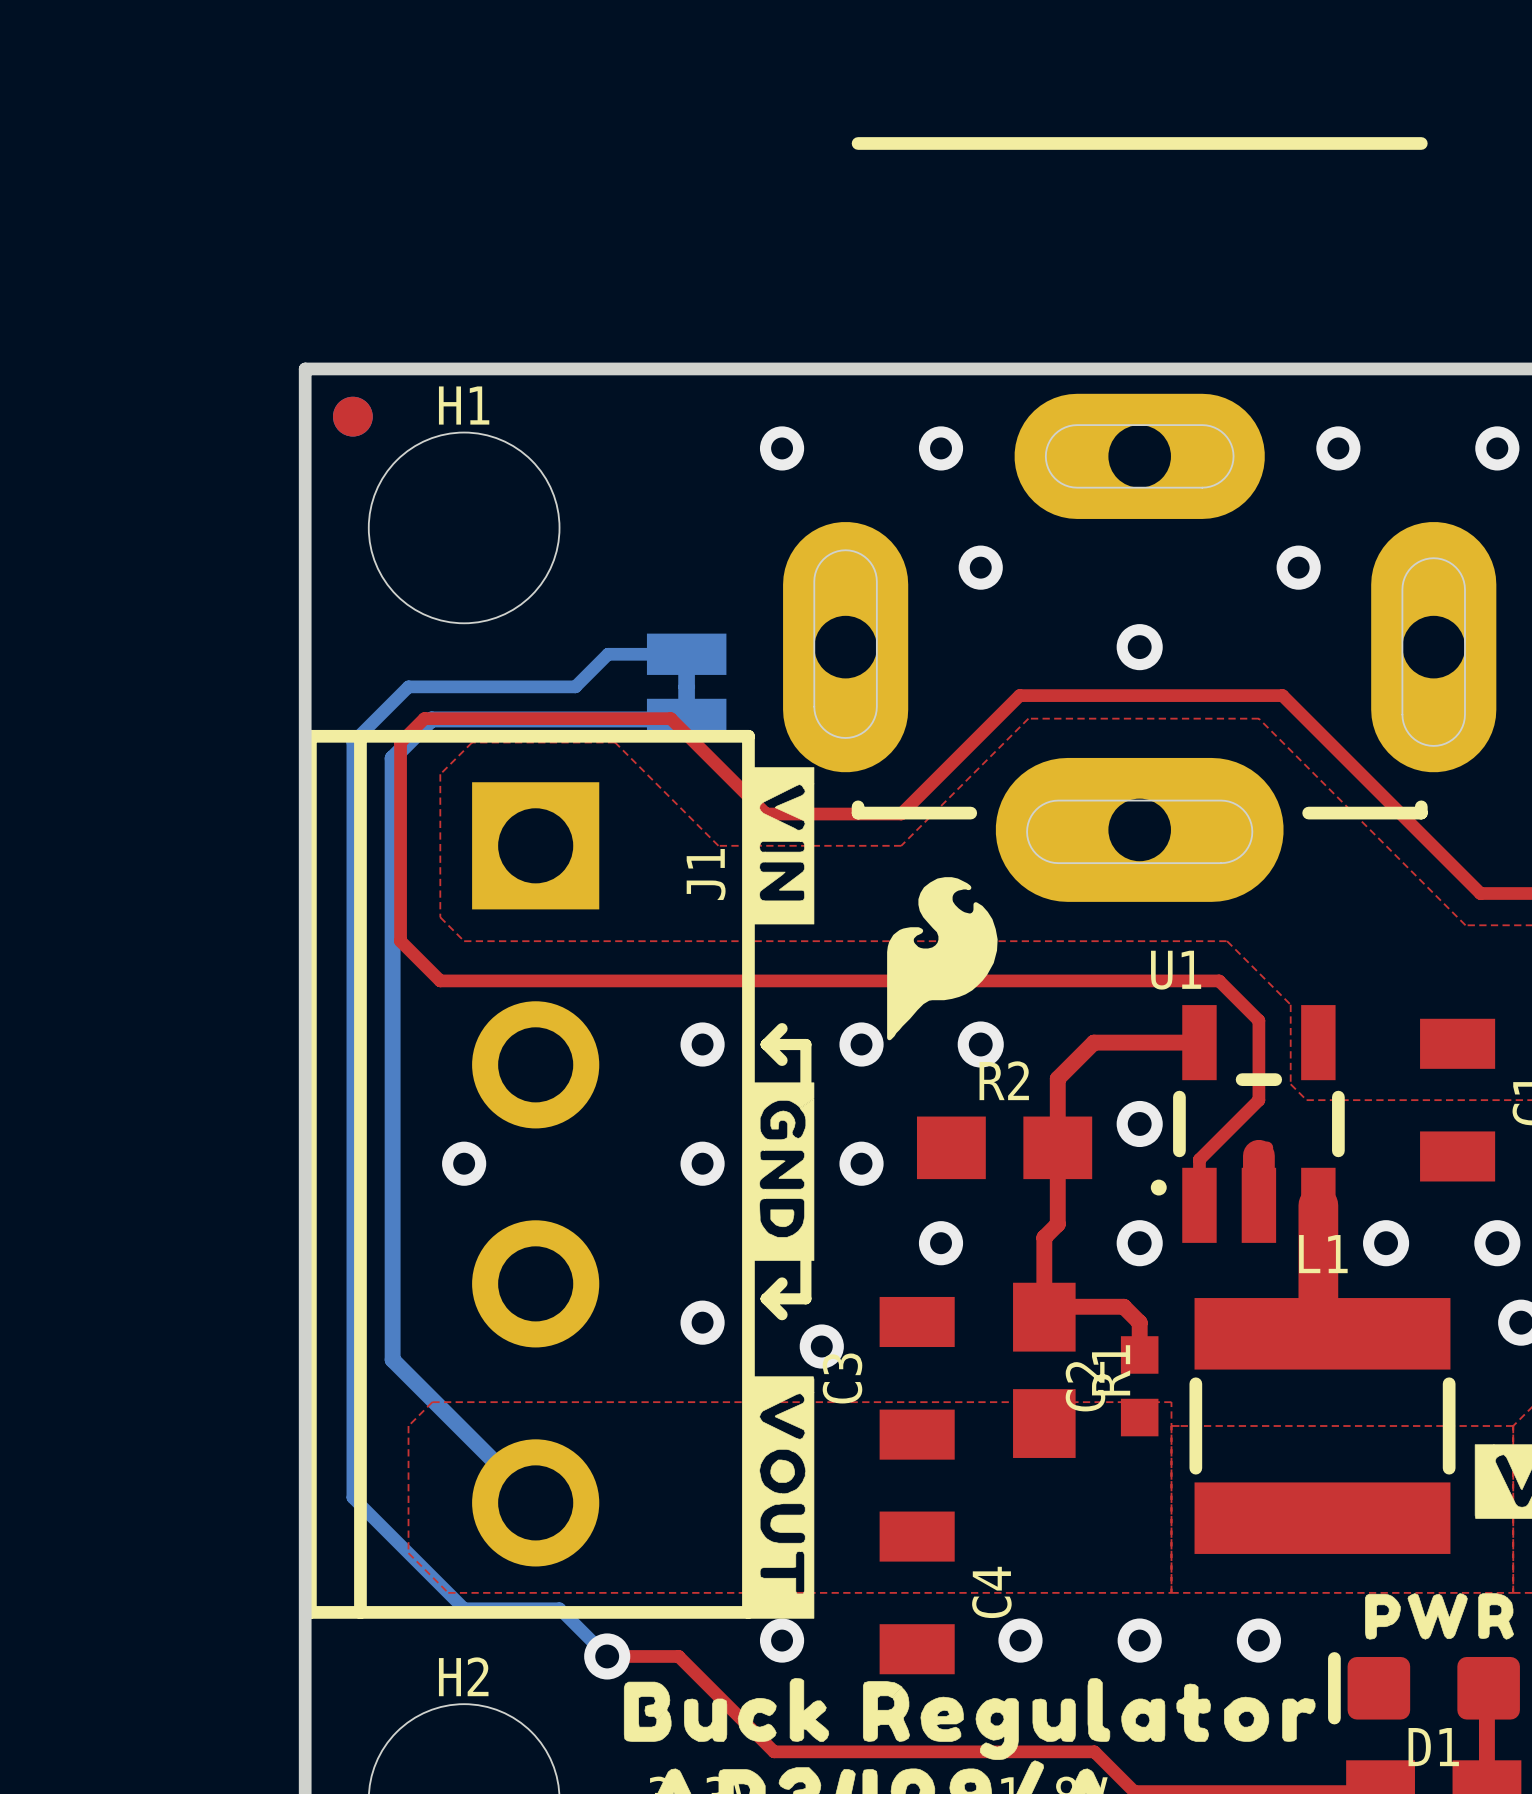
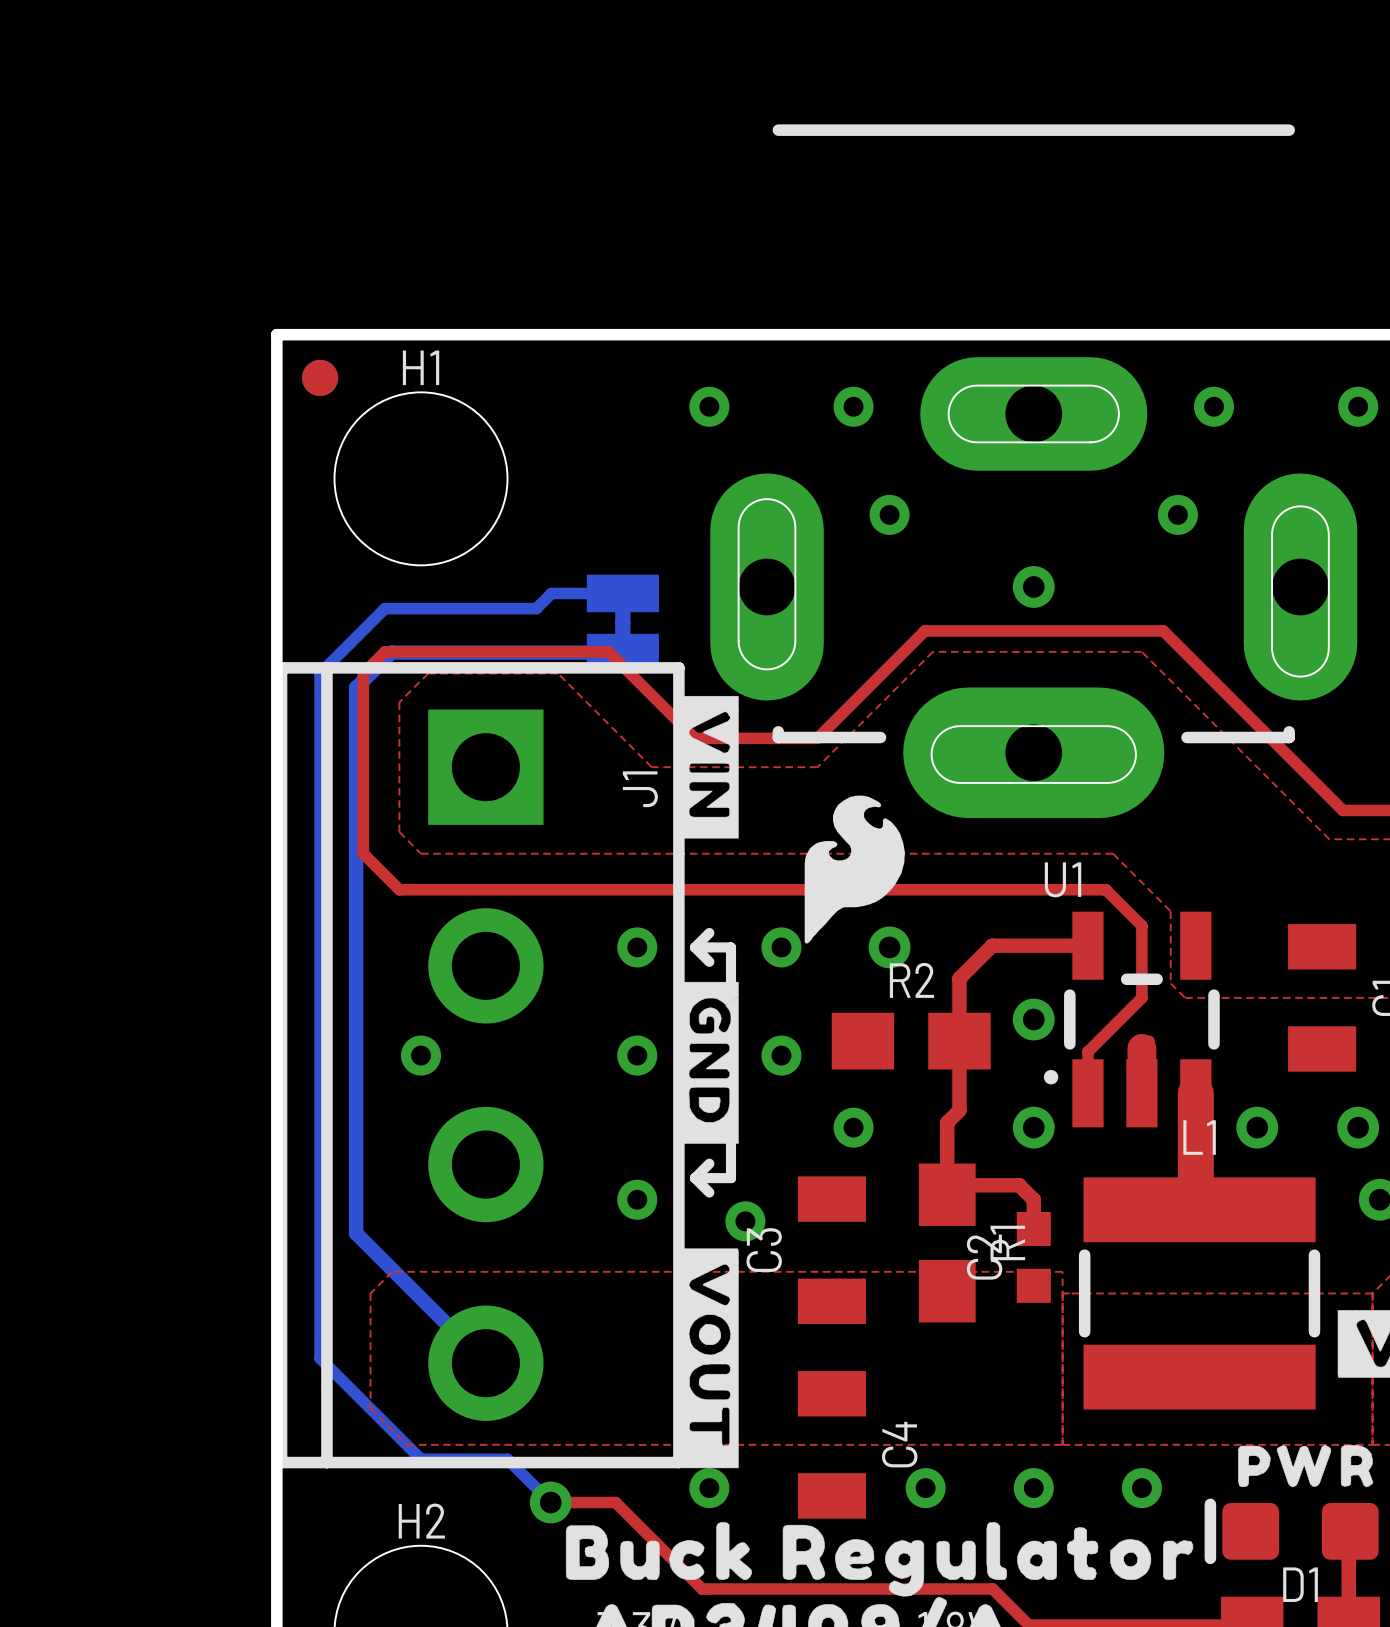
bottom track: (591, 670) (575, 686) (408, 686) -> (536, 608) (384, 608) (370, 623)

